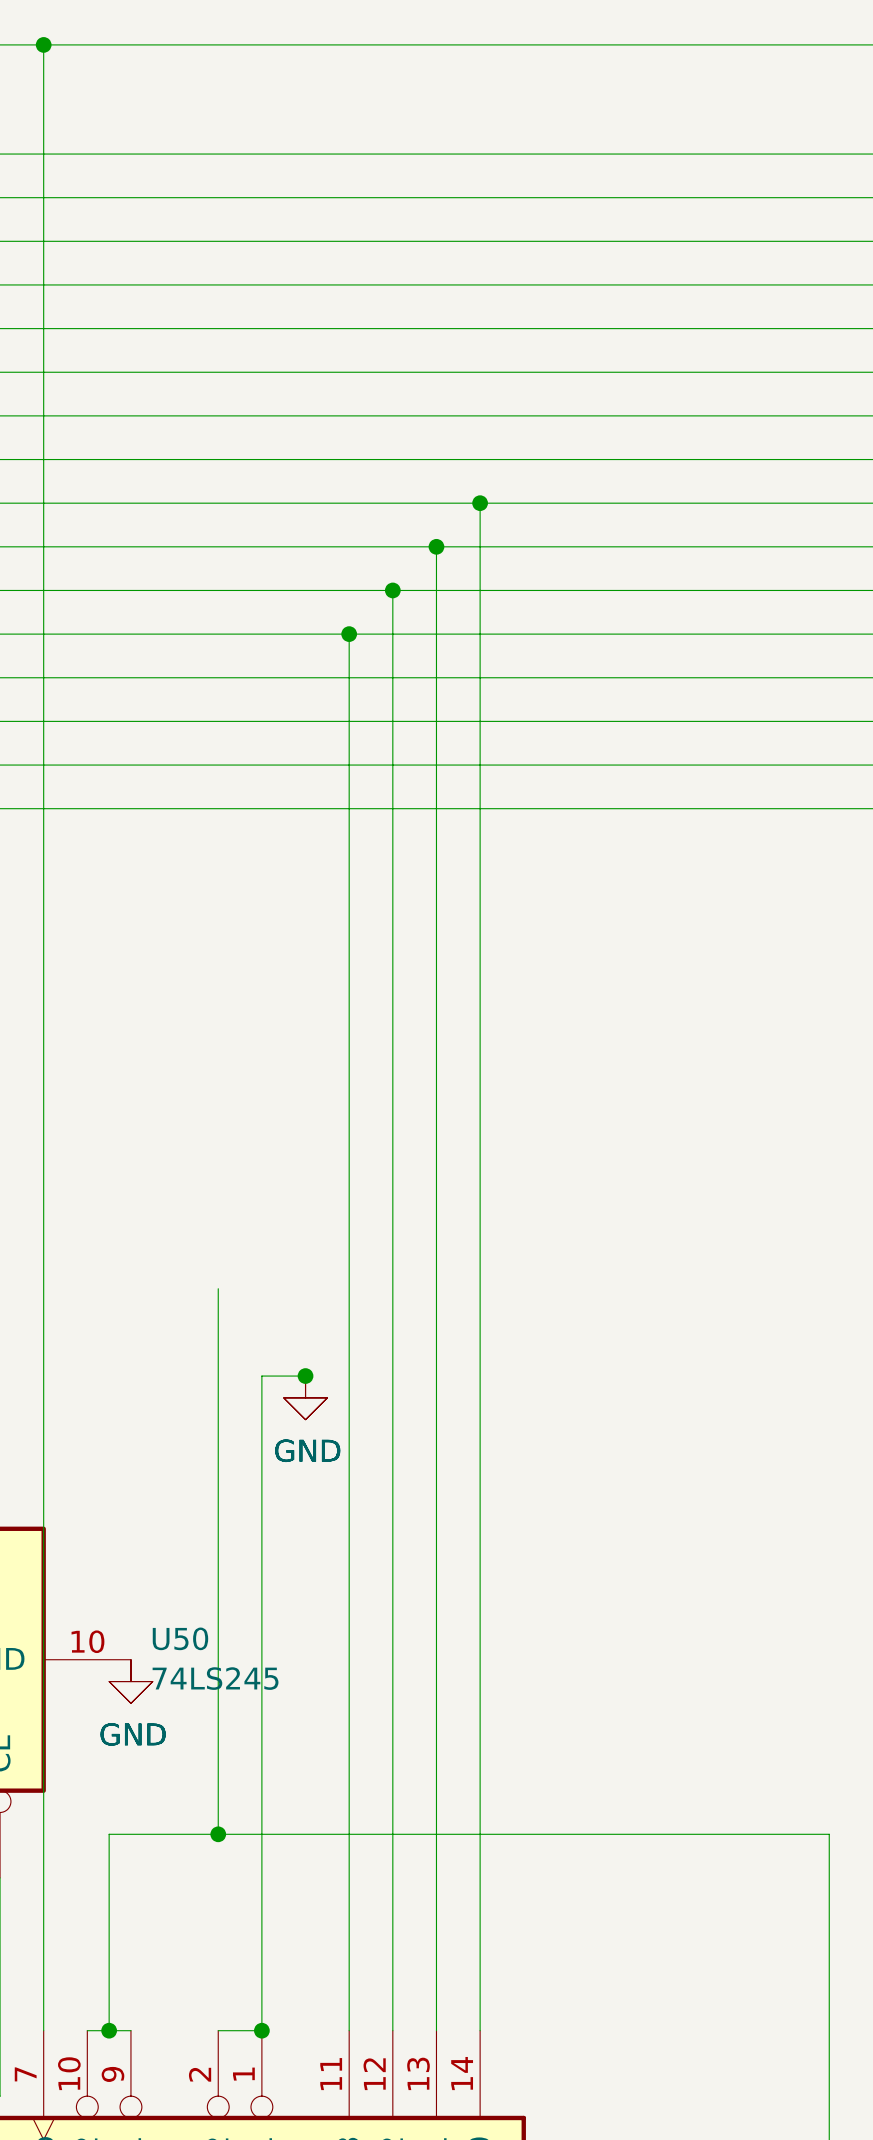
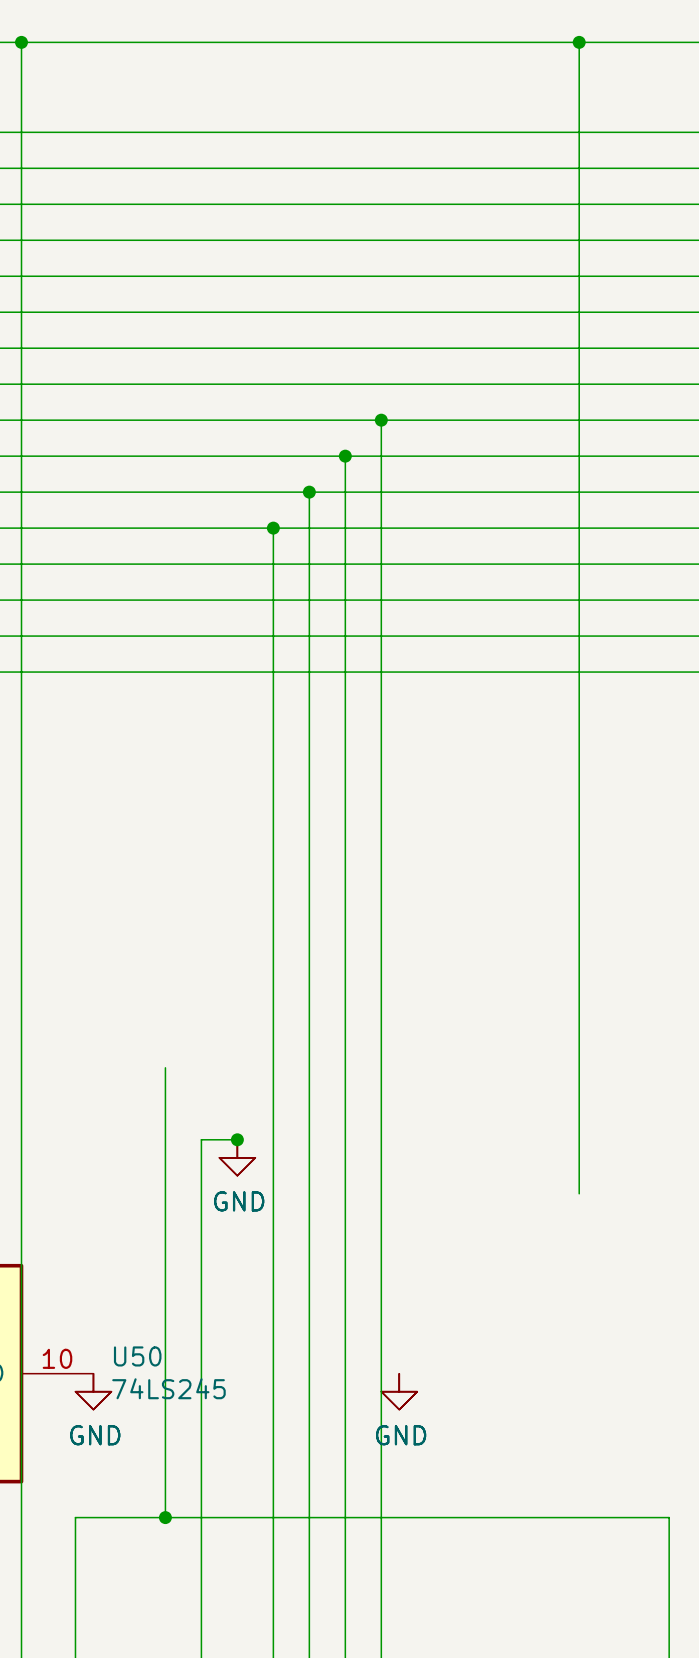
wire: none -> (579, 42) (579, 1193)
junction: none -> (579, 42)
power symbol: none -> GND (399, 1391)

